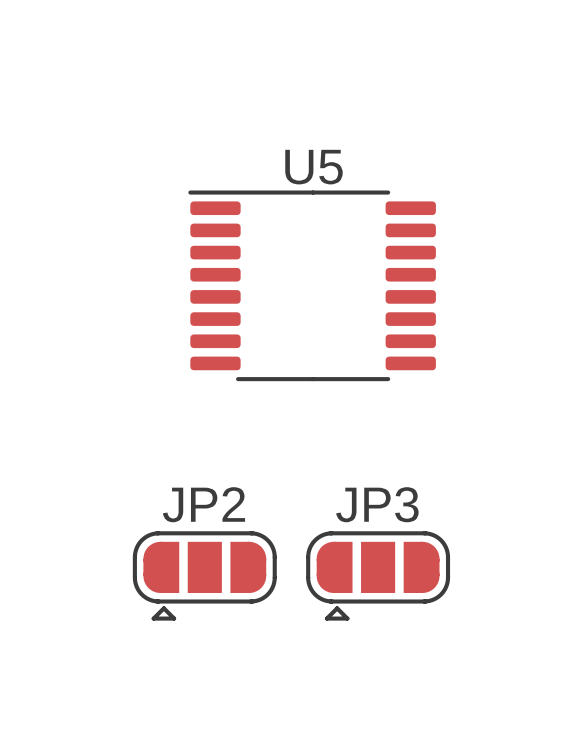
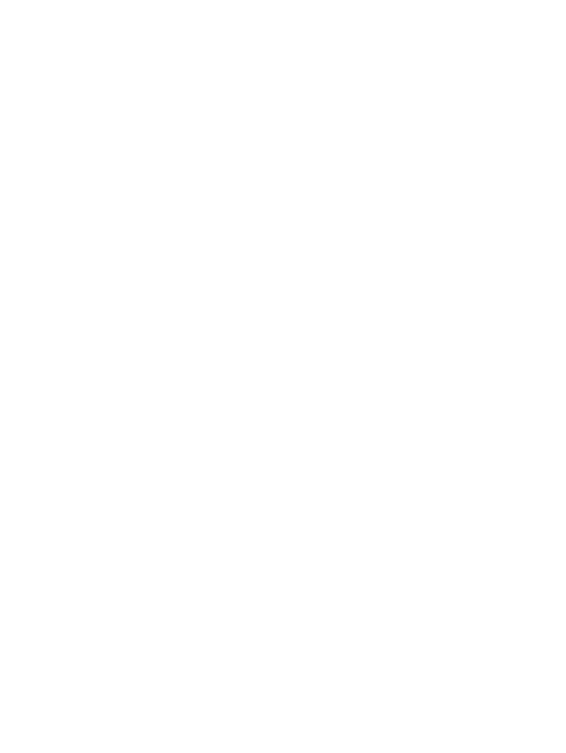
U5: (312, 285) -> none
JP2: (204, 575) -> none
JP3: (378, 575) -> none

